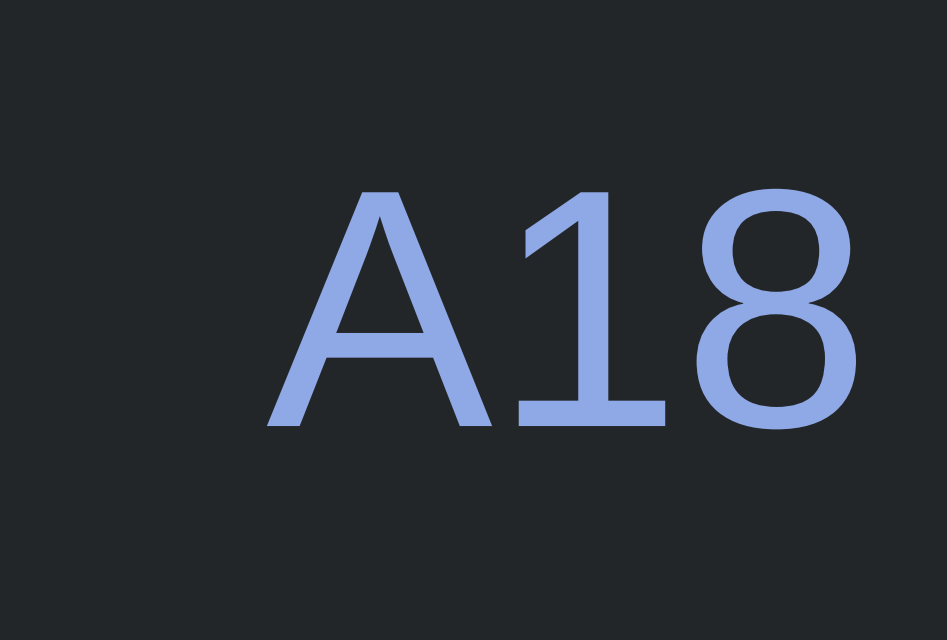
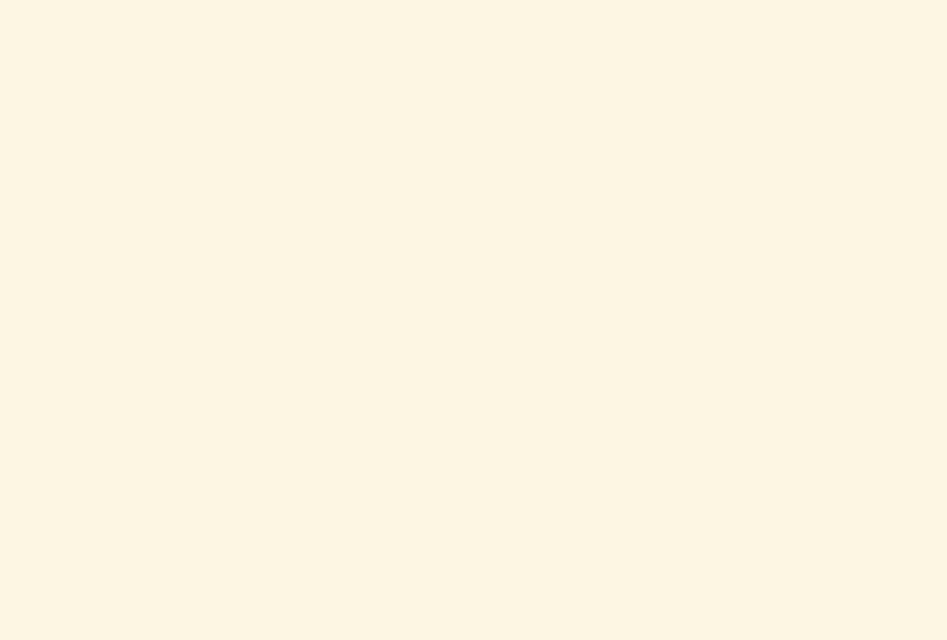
text: A18 (561, 309) -> none

